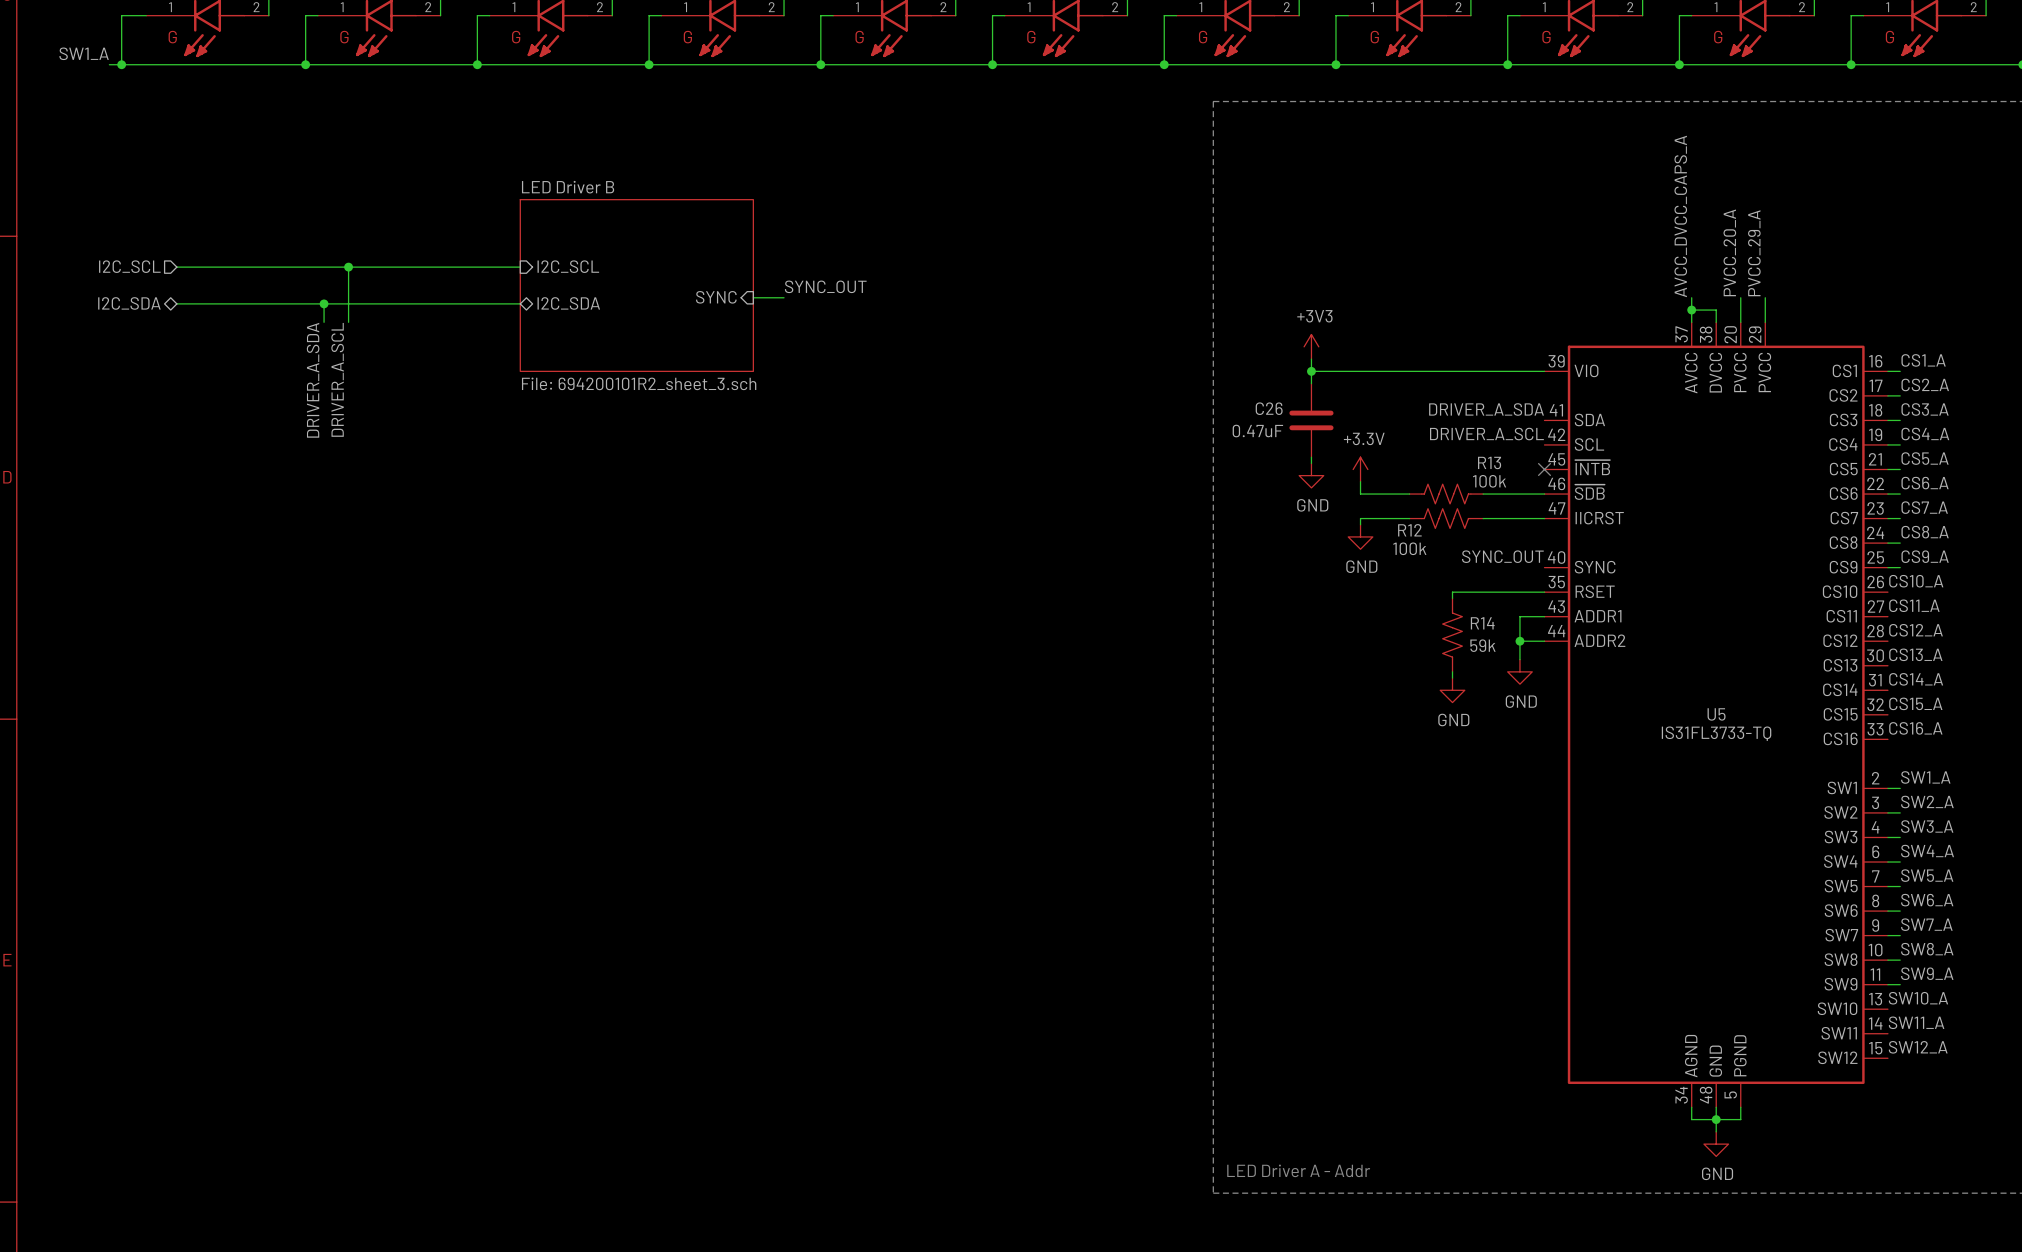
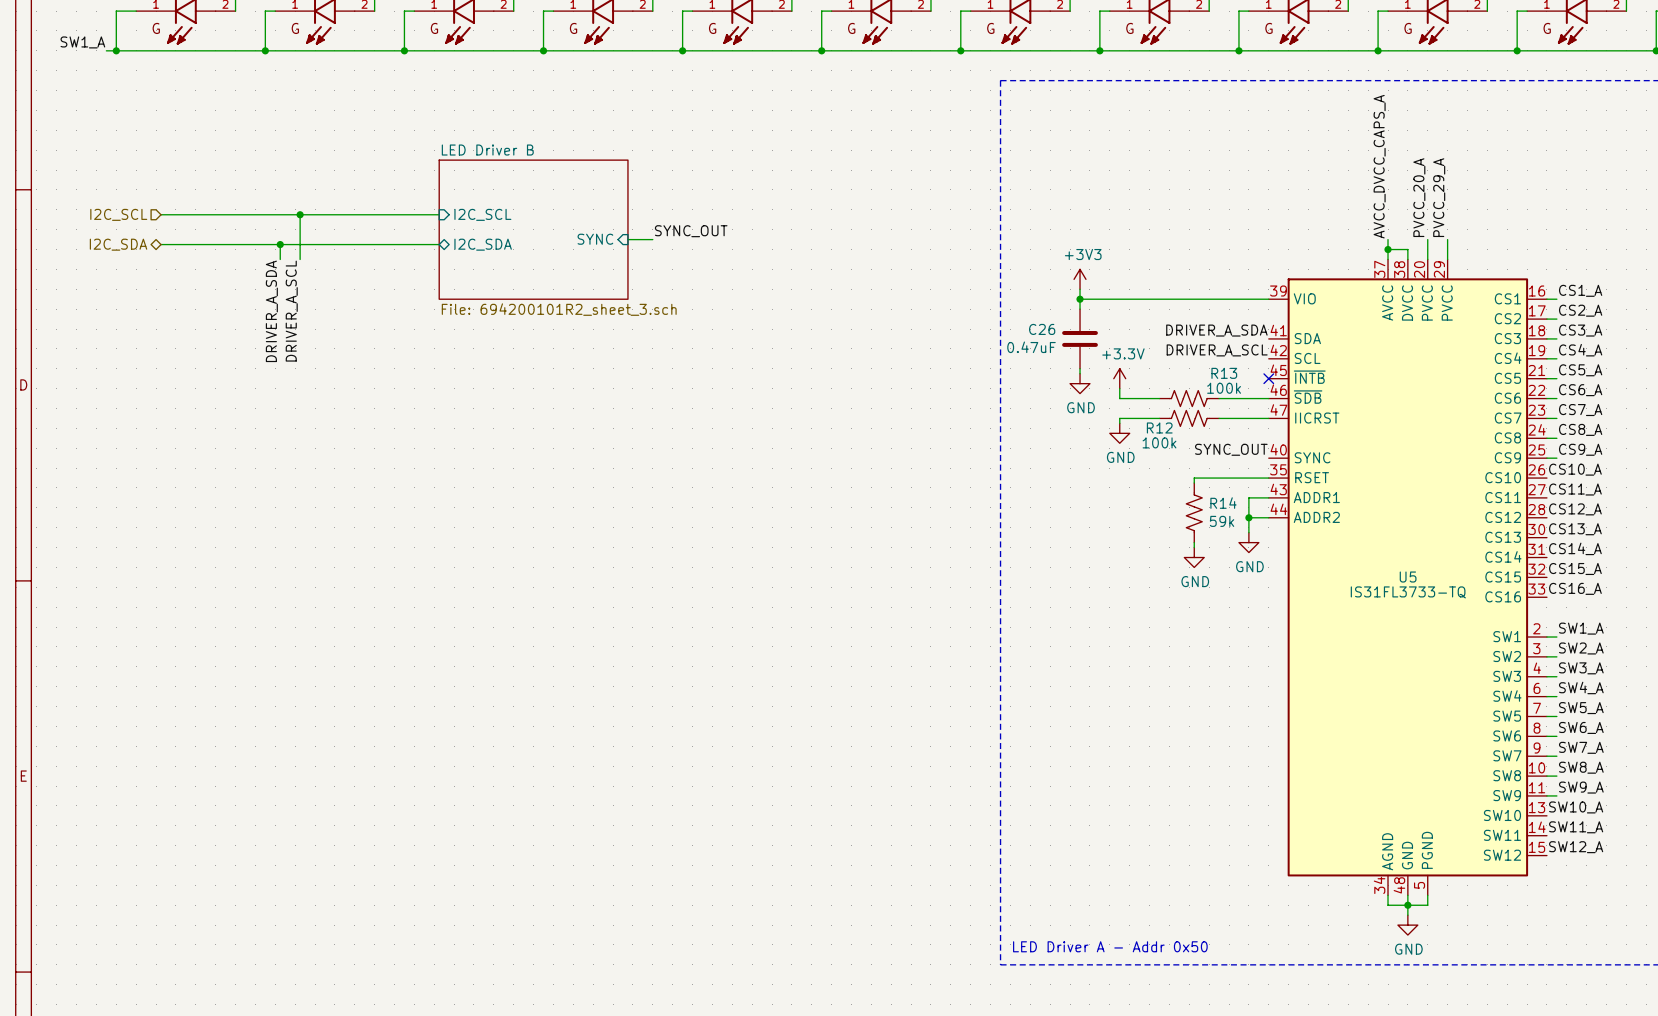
text: LED Driver A - Addr (1298, 1170) -> LED Driver A - Addr 0x50 (1110, 946)

